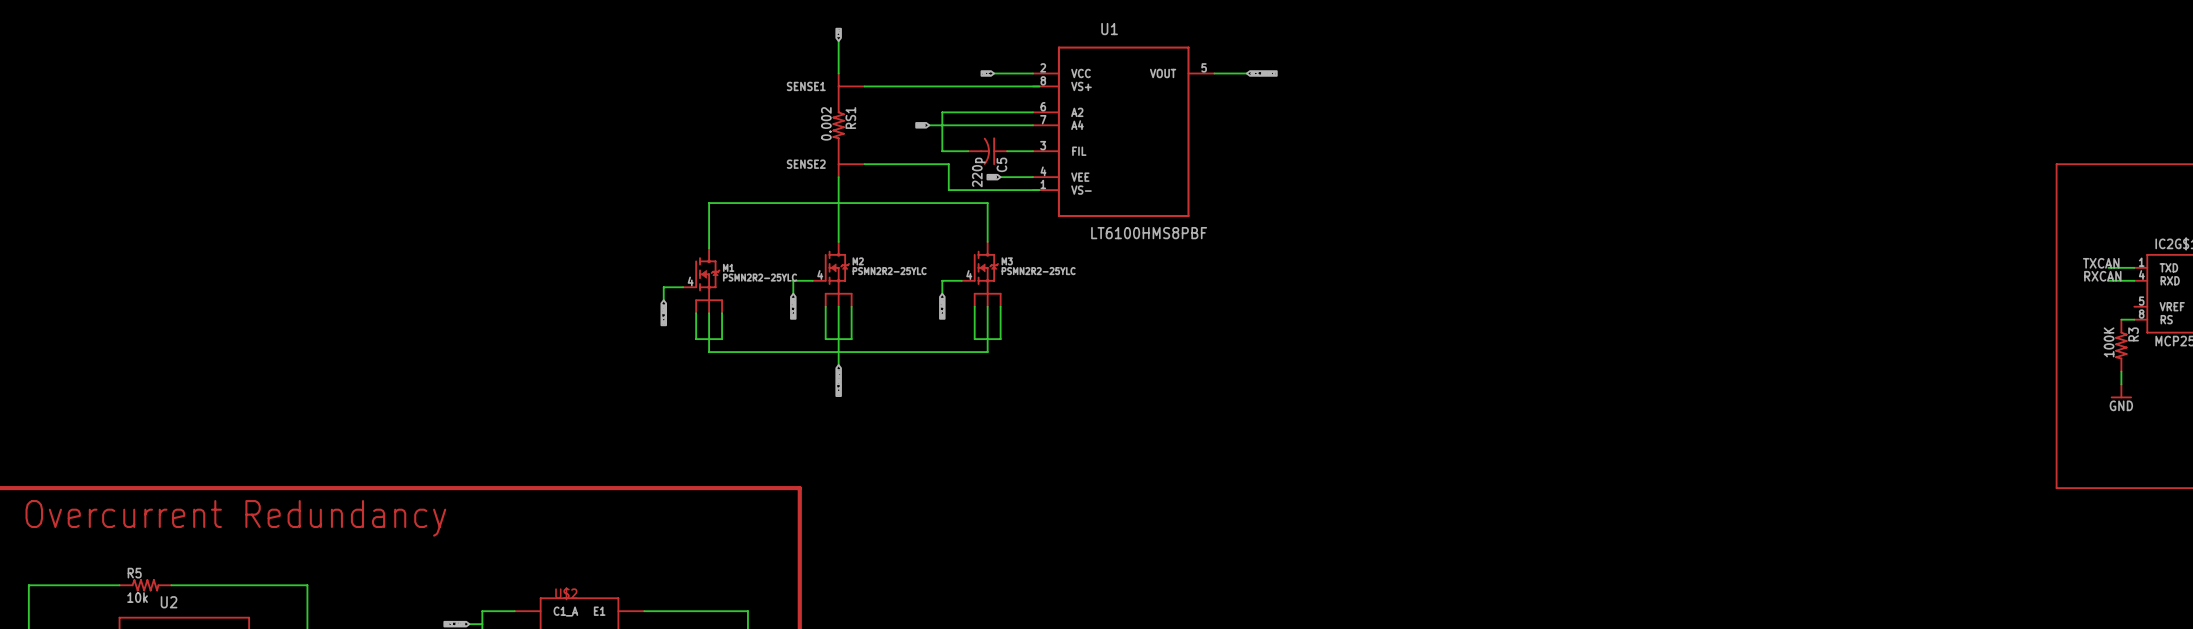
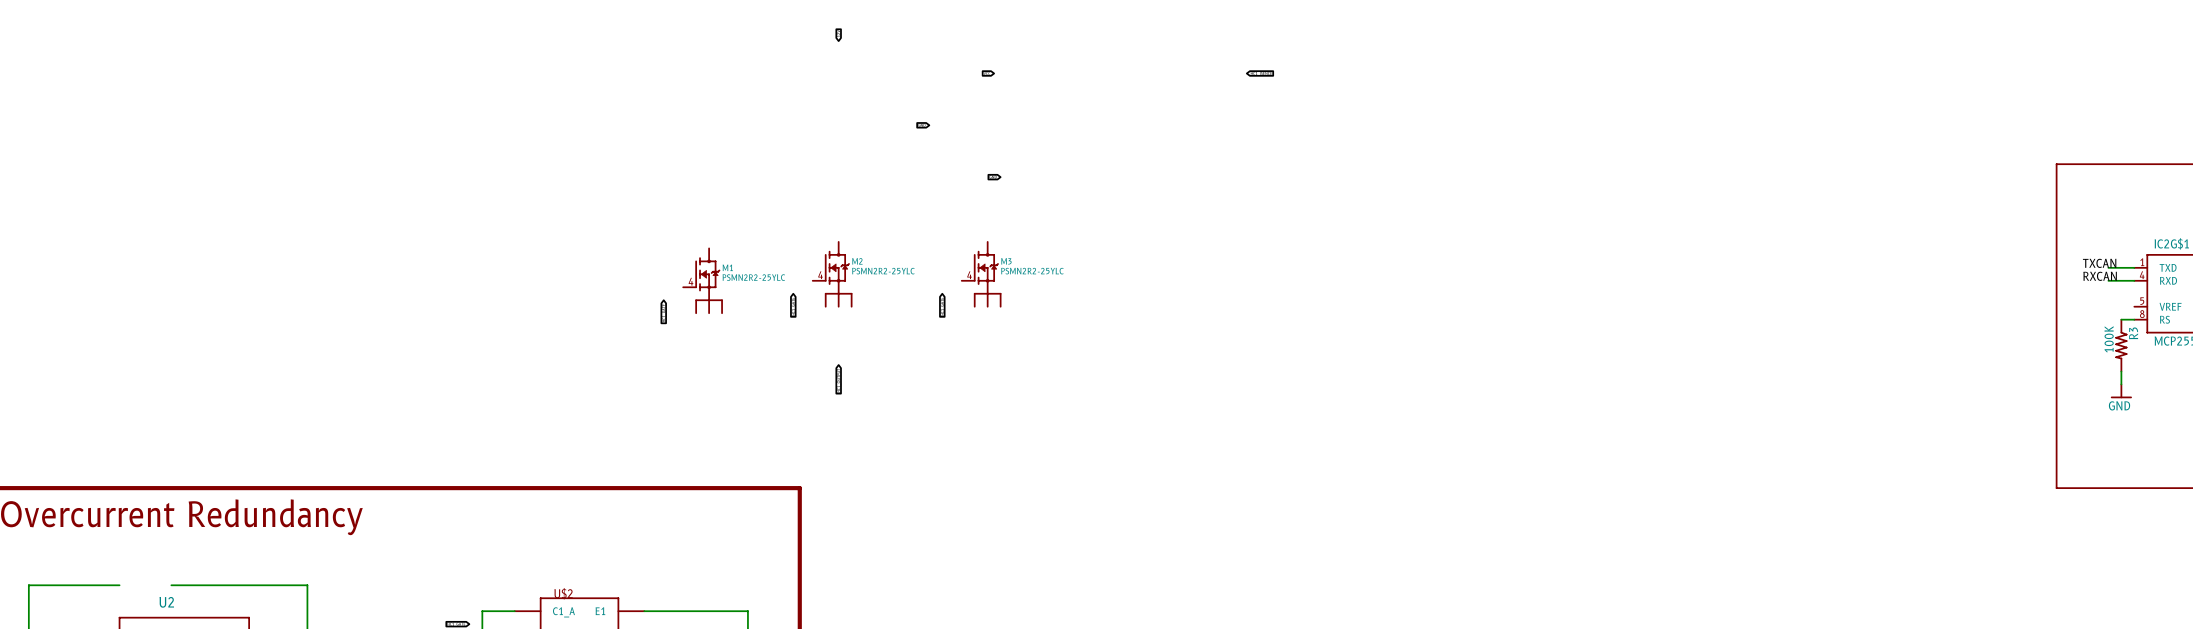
wire: (838, 41) (838, 73) -> none
wire: (994, 73) (1033, 73) -> none
wire: (1214, 73) (1246, 73) -> none
wire: (864, 86) (1039, 86) -> none
wire: (1033, 112) (942, 112) (942, 151) (968, 151) -> none
RS1: 0.002 (848, 125) -> none
wire: (929, 125) (1033, 125) -> none
U1: LT6100HMS8PBF (1123, 131) -> none
C5: 220p (987, 151) -> none
wire: (1007, 151) (1033, 151) -> none
wire: (864, 164) (948, 164) (948, 190) (1039, 190) -> none
wire: (838, 177) (838, 241) -> none
wire: (1000, 177) (1033, 177) -> none
wire: (987, 241) (987, 203) (709, 203) (709, 248) -> none
wire: (812, 280) (793, 280) (793, 293) -> none
wire: (961, 280) (942, 280) (942, 293) -> none
wire: (683, 287) (663, 287) (663, 300) -> none
wire: (825, 306) (825, 339) (851, 339) (851, 306) -> none
wire: (838, 306) (838, 365) -> none
wire: (974, 306) (974, 339) (1000, 339) (1000, 306) -> none
wire: (987, 306) (987, 352) (709, 352) (709, 313) -> none
wire: (696, 313) (696, 339) (722, 339) (722, 313) -> none
R5: 10k (145, 585) -> none
wire: (469, 624) (482, 624) -> none

